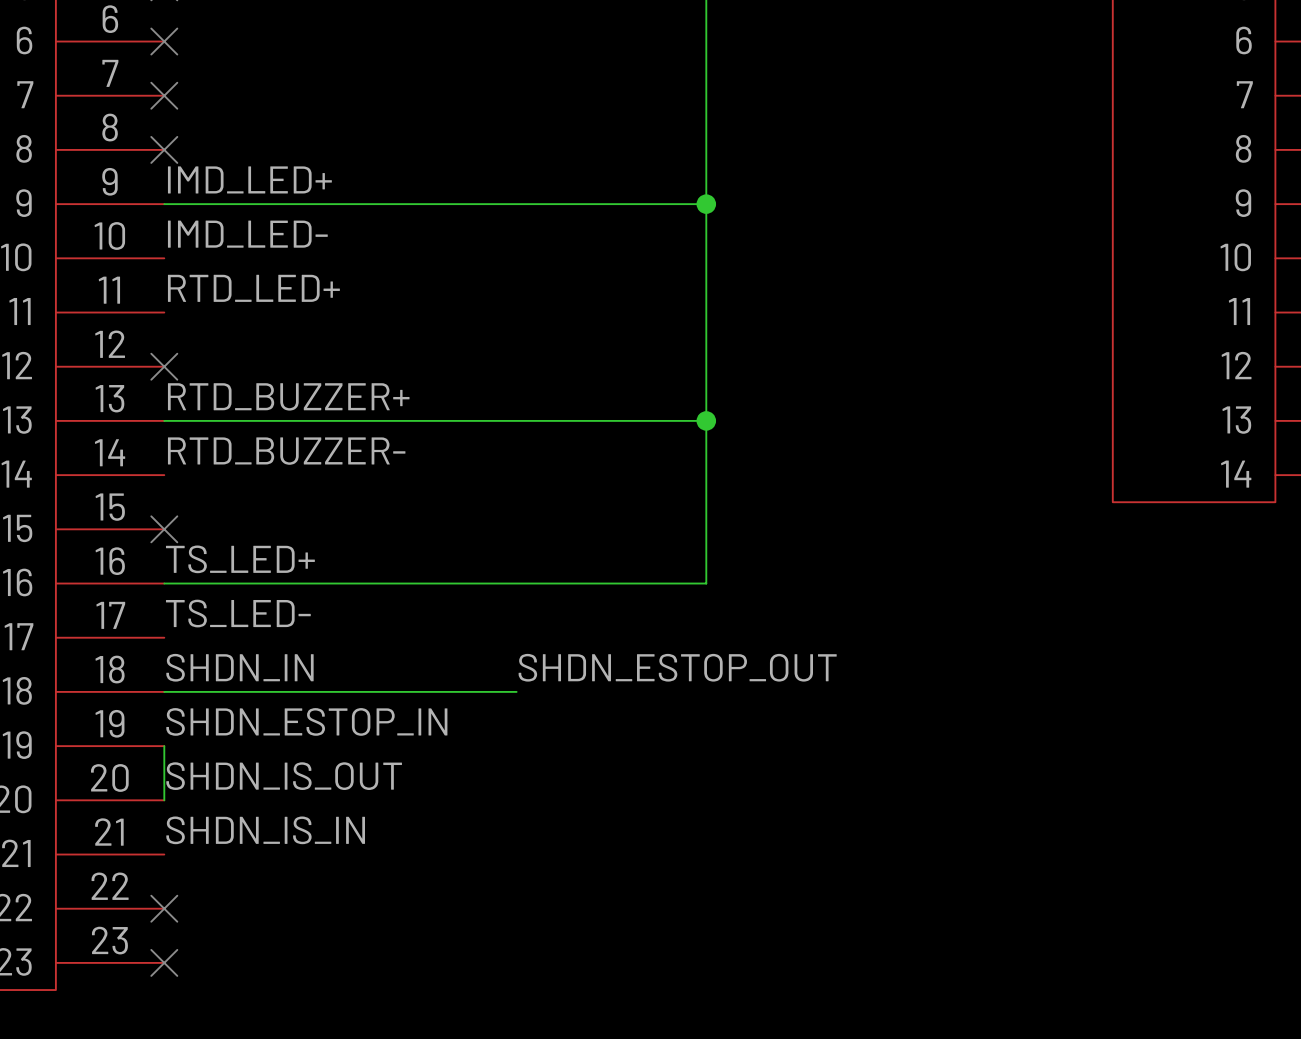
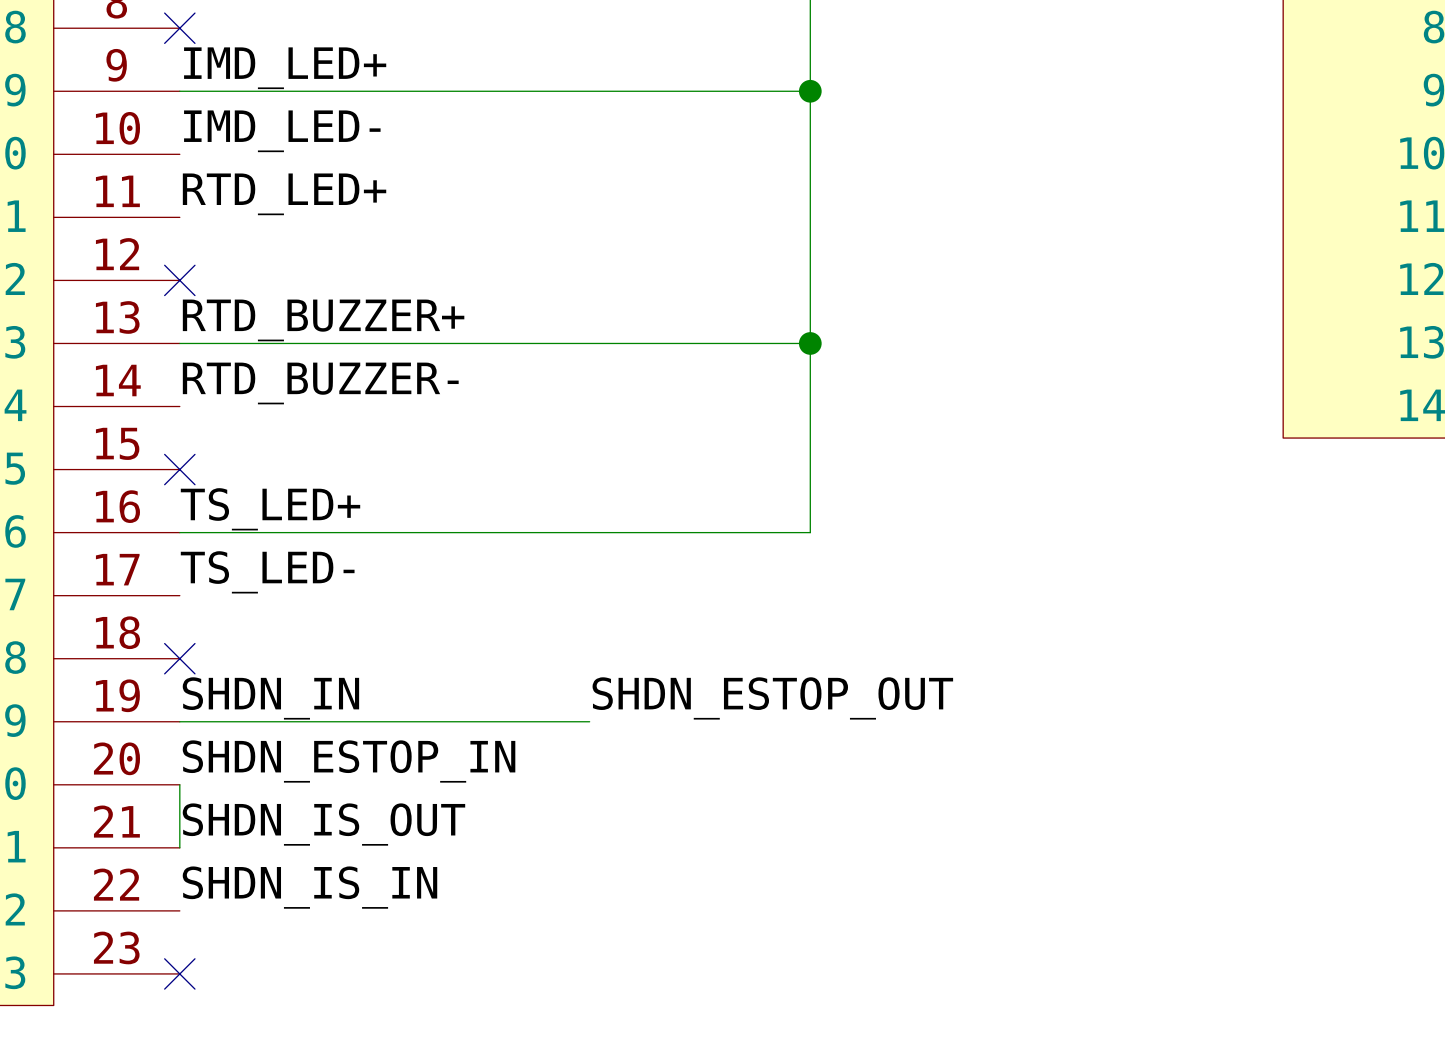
label: SHDN_IN (239, 667) -> none
label position: SHDN_ESTOP_OUT (677, 667) -> SHDN_ESTOP_OUT (772, 698)
wire: (164, 691) (516, 691) -> (179, 721) (589, 721)
no-connect mark: none -> (179, 658)
label: SHDN_ESTOP_IN (306, 721) -> SHDN_IN (270, 698)
wire: (164, 746) (164, 800) -> (179, 847) (179, 784)
label: SHDN_IS_OUT (284, 776) -> SHDN_ESTOP_IN (349, 761)
label: SHDN_IS_IN (265, 830) -> SHDN_IS_OUT (323, 824)
label: none -> SHDN_IS_IN (309, 887)
no-connect mark: (164, 908) -> none

